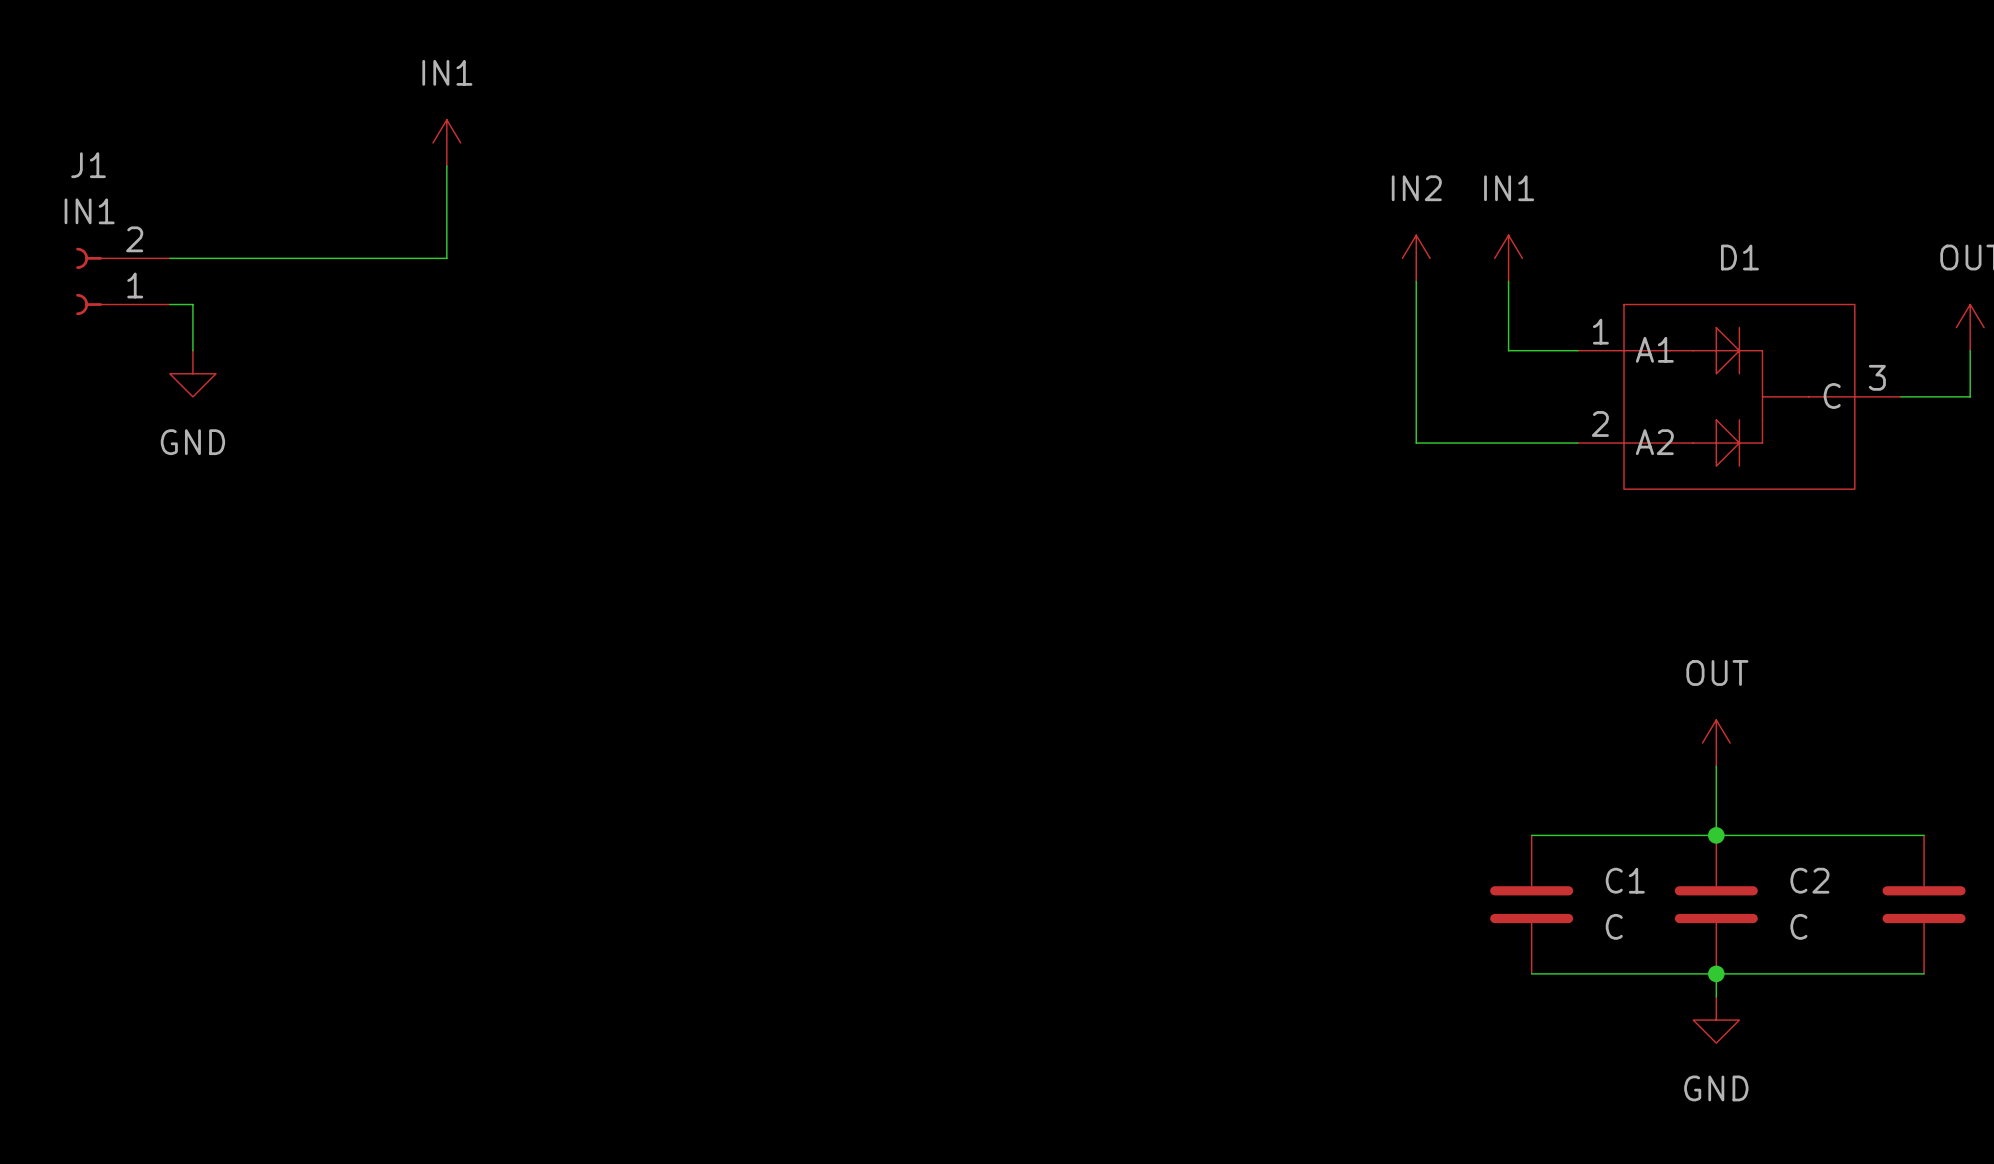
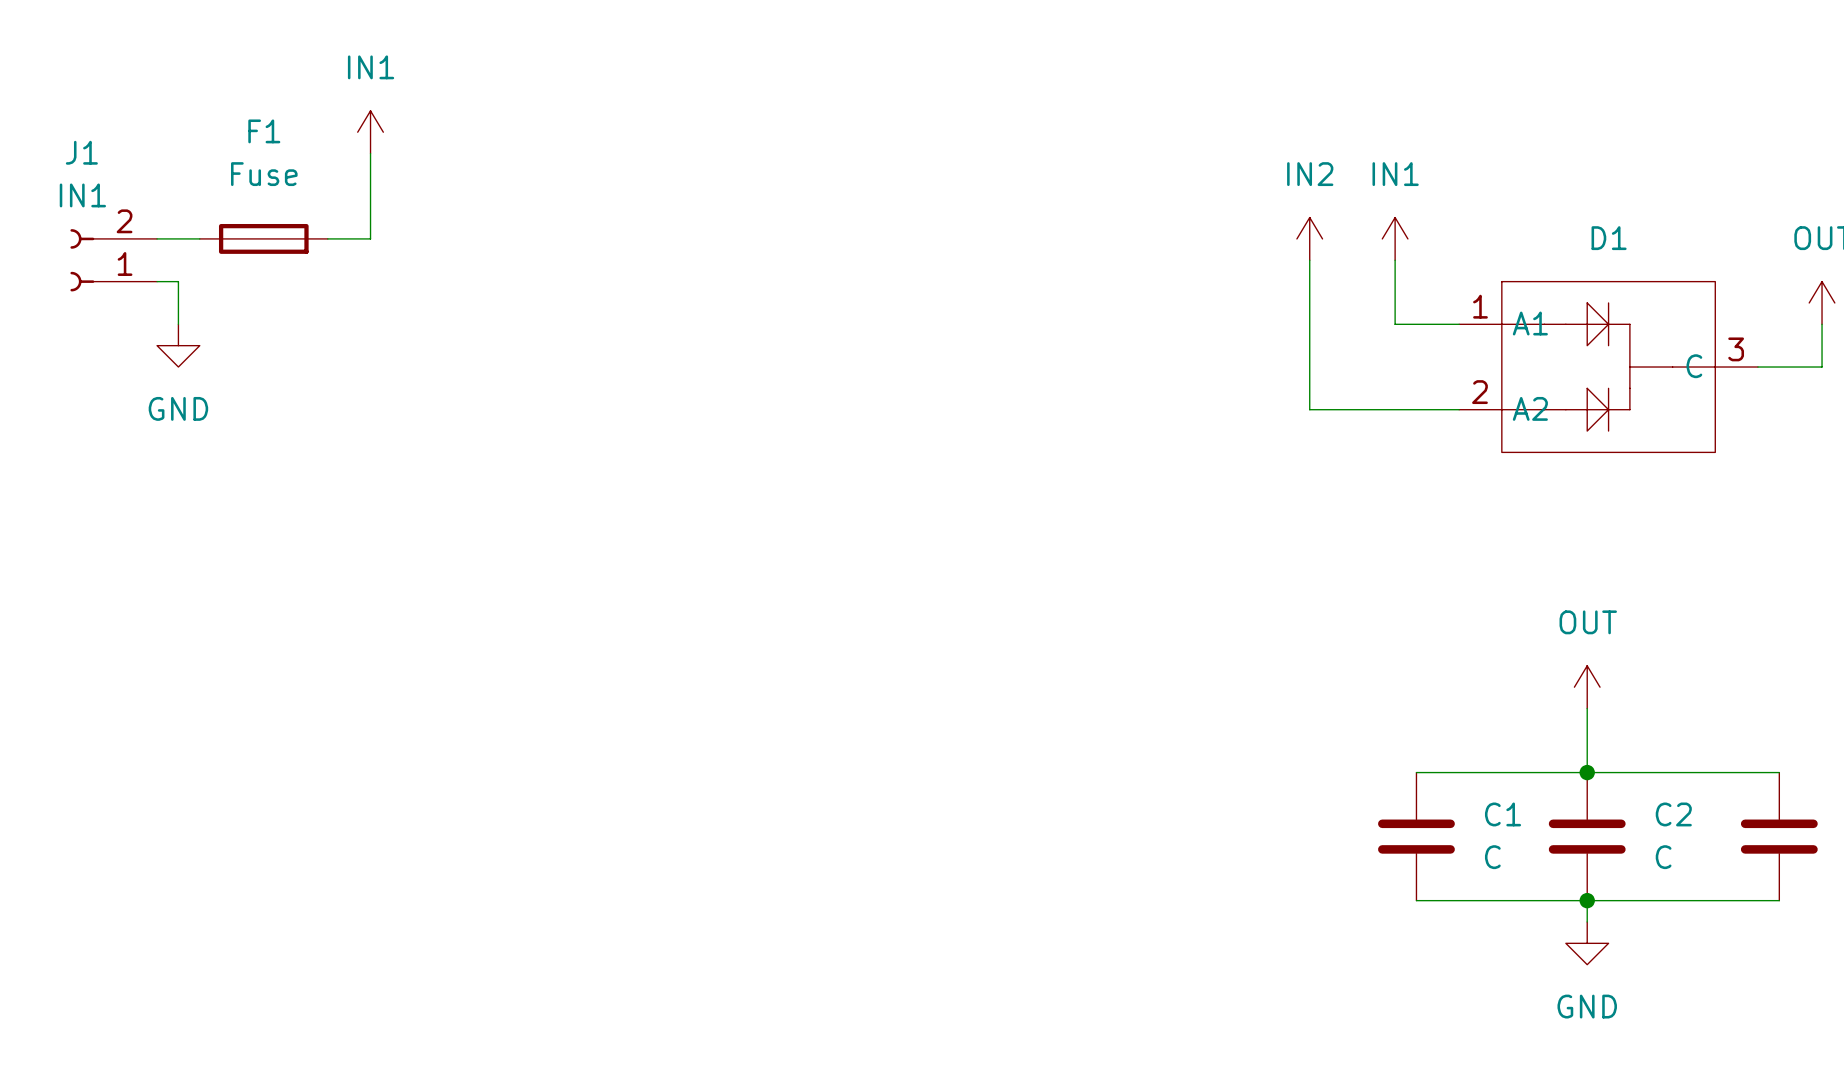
power symbol position: IN1 (446, 142) -> IN1 (370, 132)
wire: (446, 166) (446, 258) (400, 258) -> (370, 153) (370, 238)
F1: none -> Fuse (263, 238)

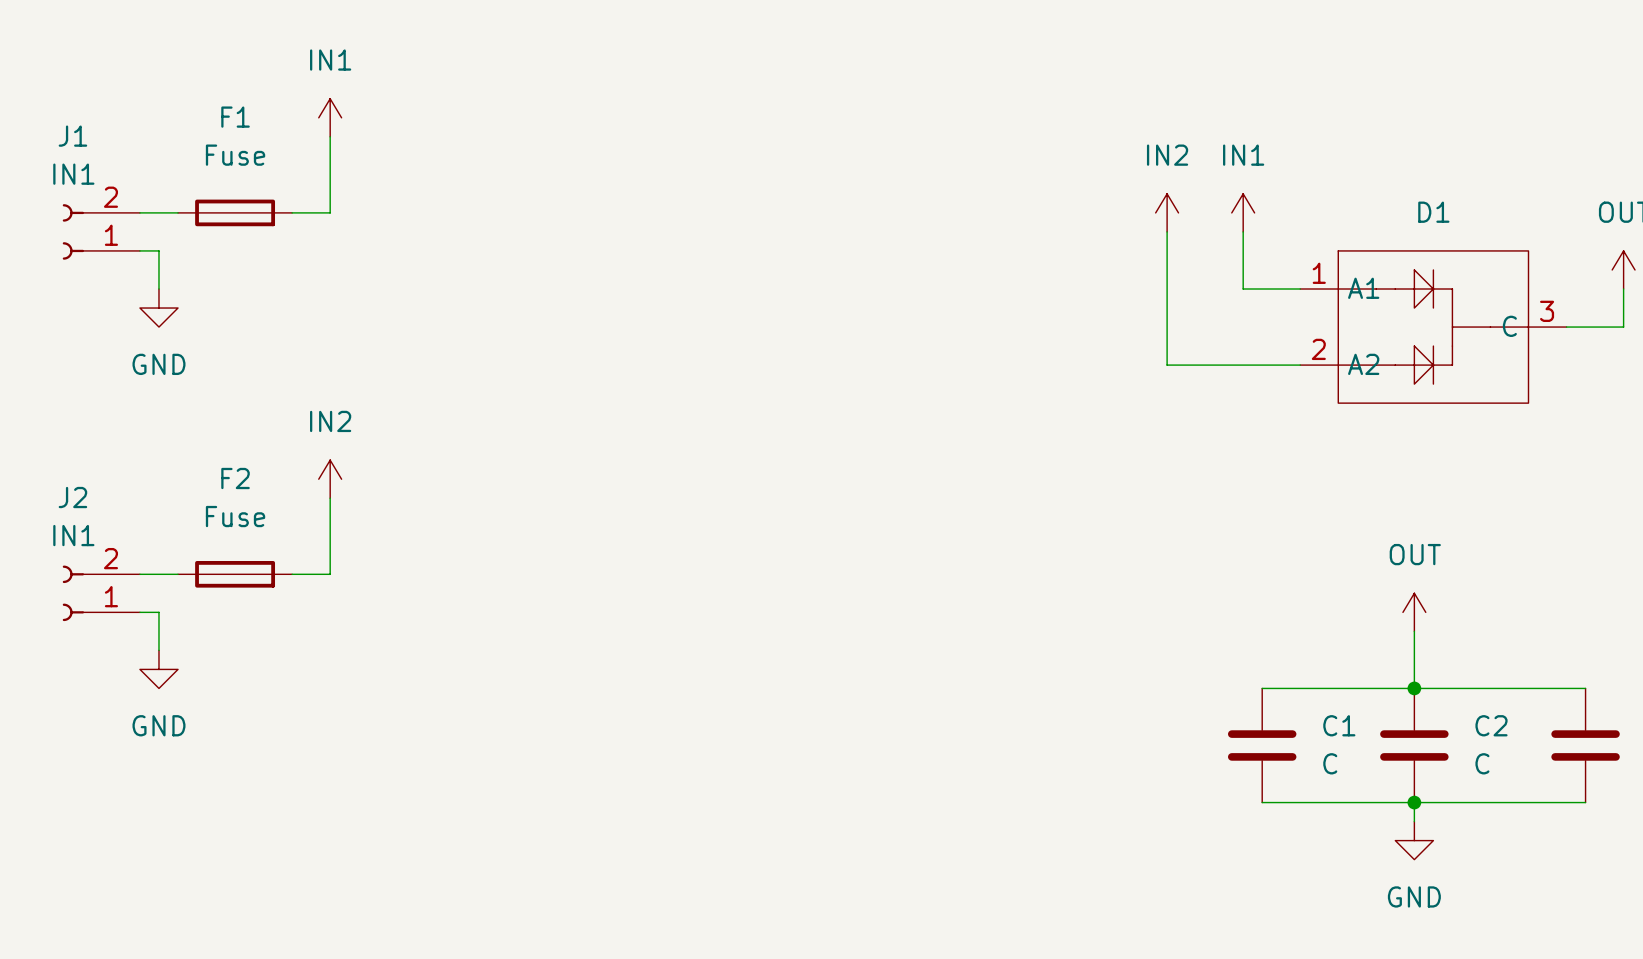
power symbol: none -> IN2 (330, 479)
wire: none -> (330, 498) (330, 574) (292, 574)
wire: none -> (139, 574) (178, 574)
F2: none -> Fuse (235, 574)
J2: none -> IN1 (101, 593)
wire: none -> (139, 612) (158, 612) (158, 650)
power symbol: none -> GND (158, 669)

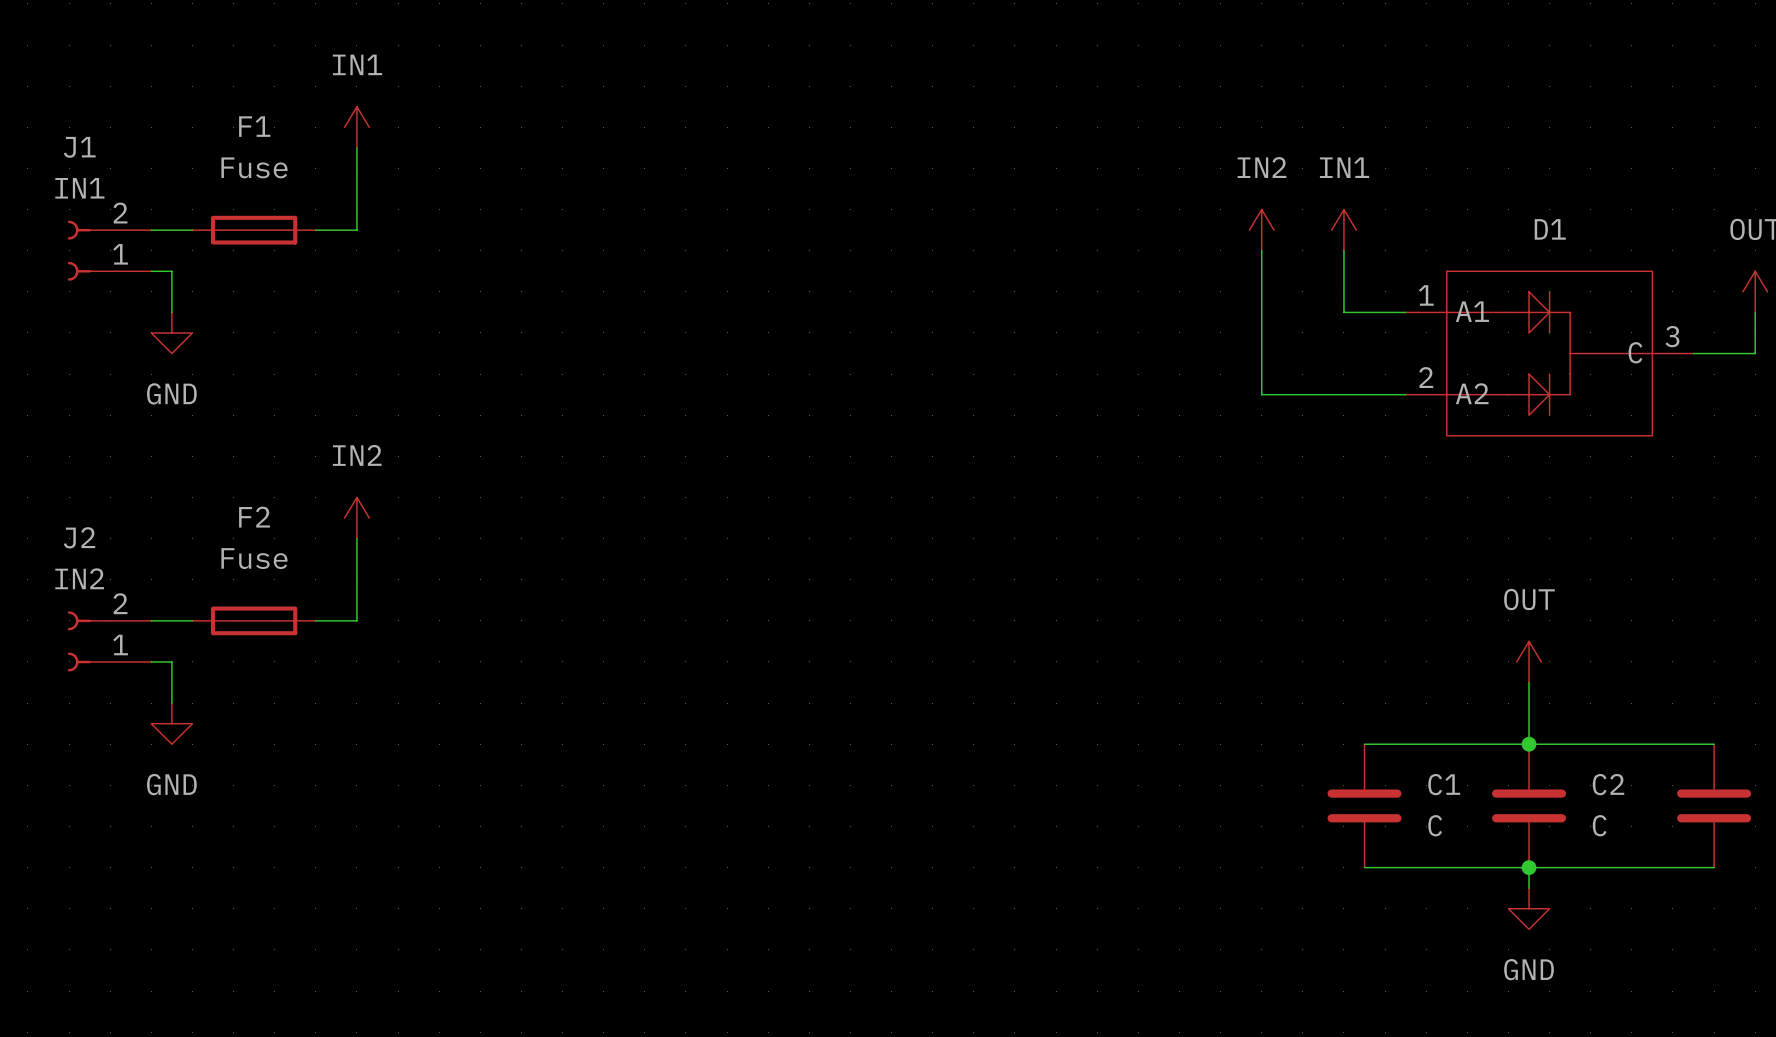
J2 value: IN1 (73, 535) -> IN2 (79, 578)

